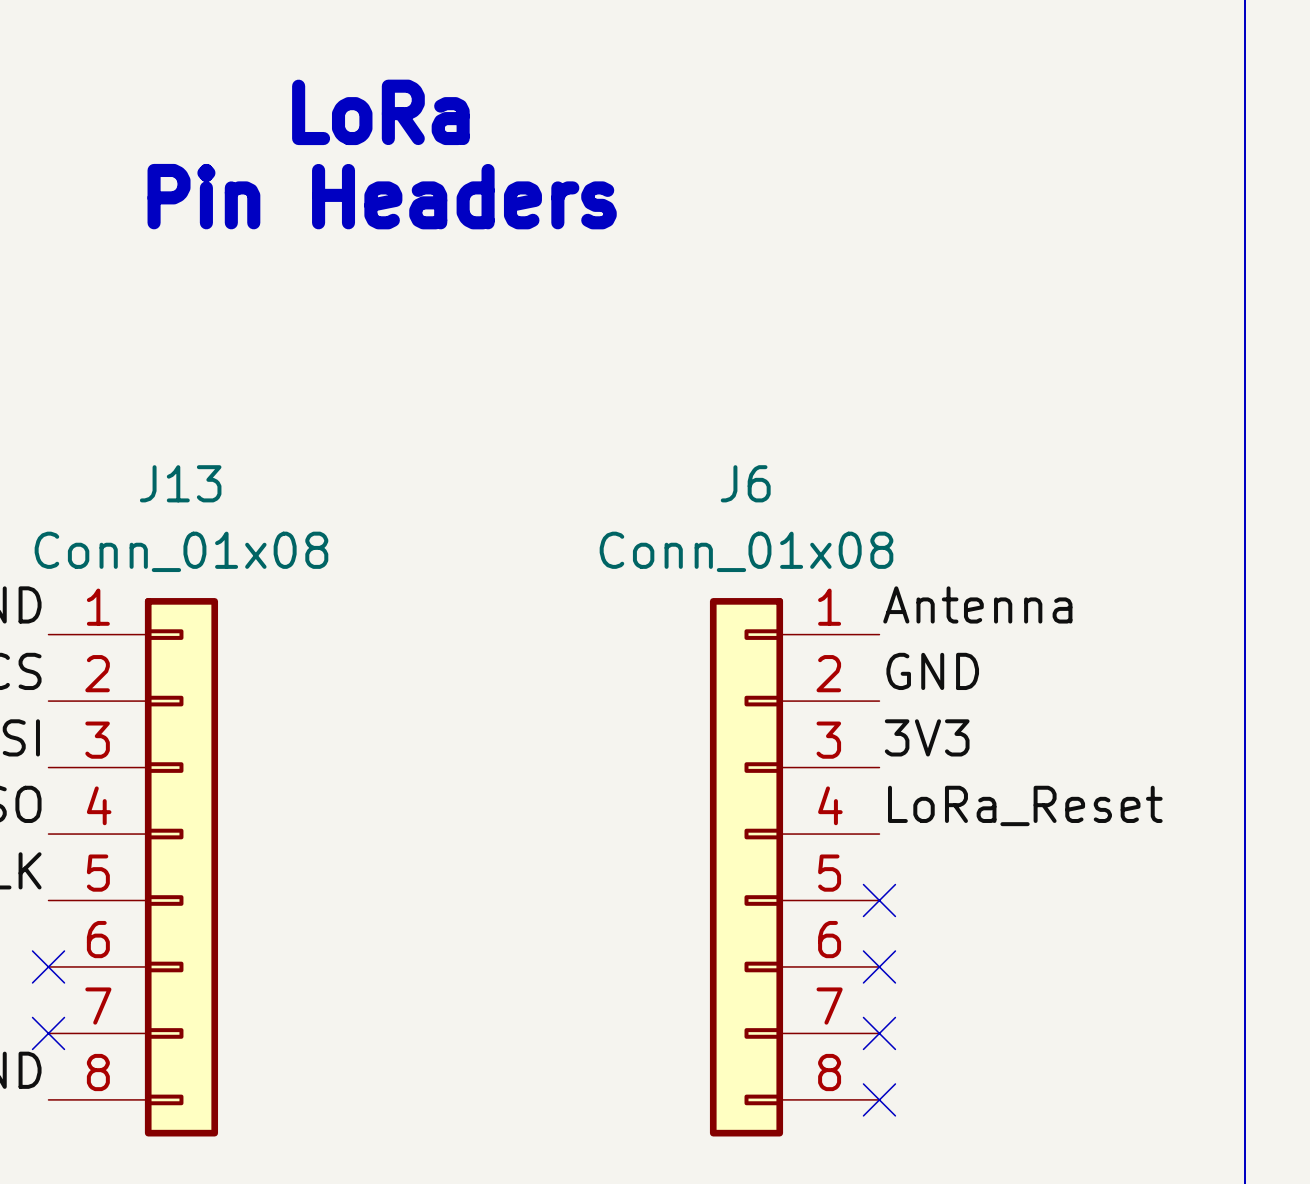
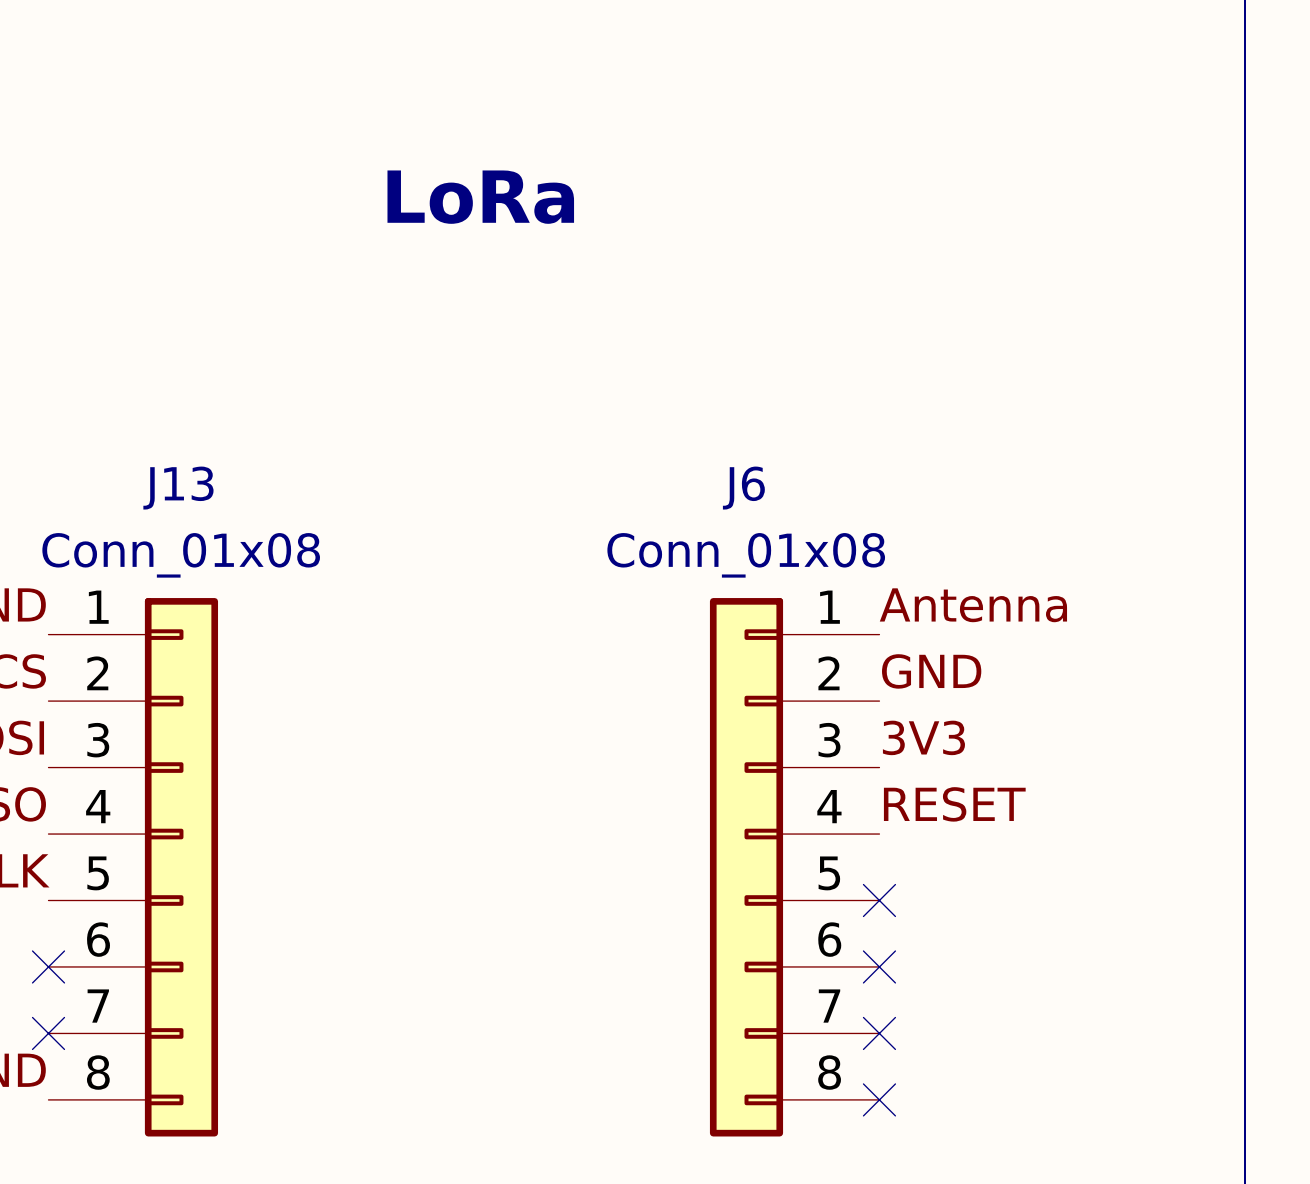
text: LoRa (380, 112) -> none
text: Pin Headers (382, 196) -> LoRa (480, 197)
label: LoRa_Reset (1025, 805) -> RESET (954, 804)

